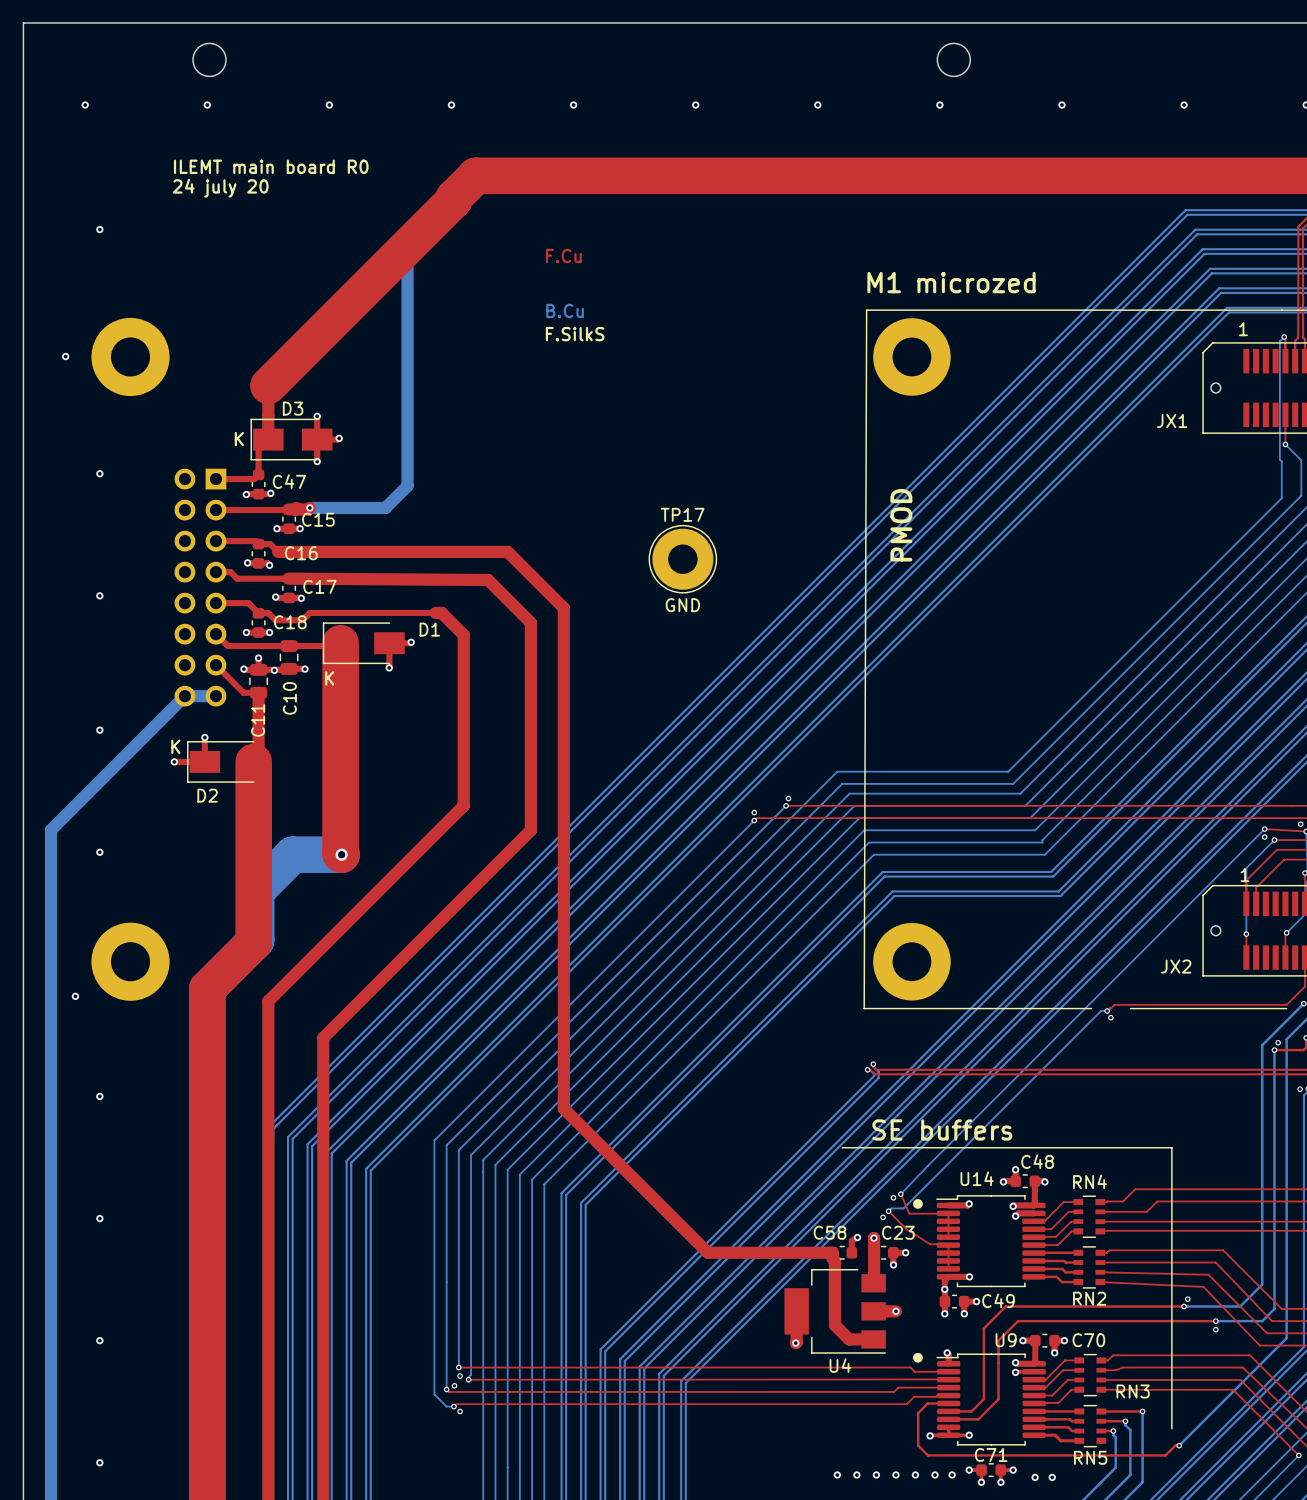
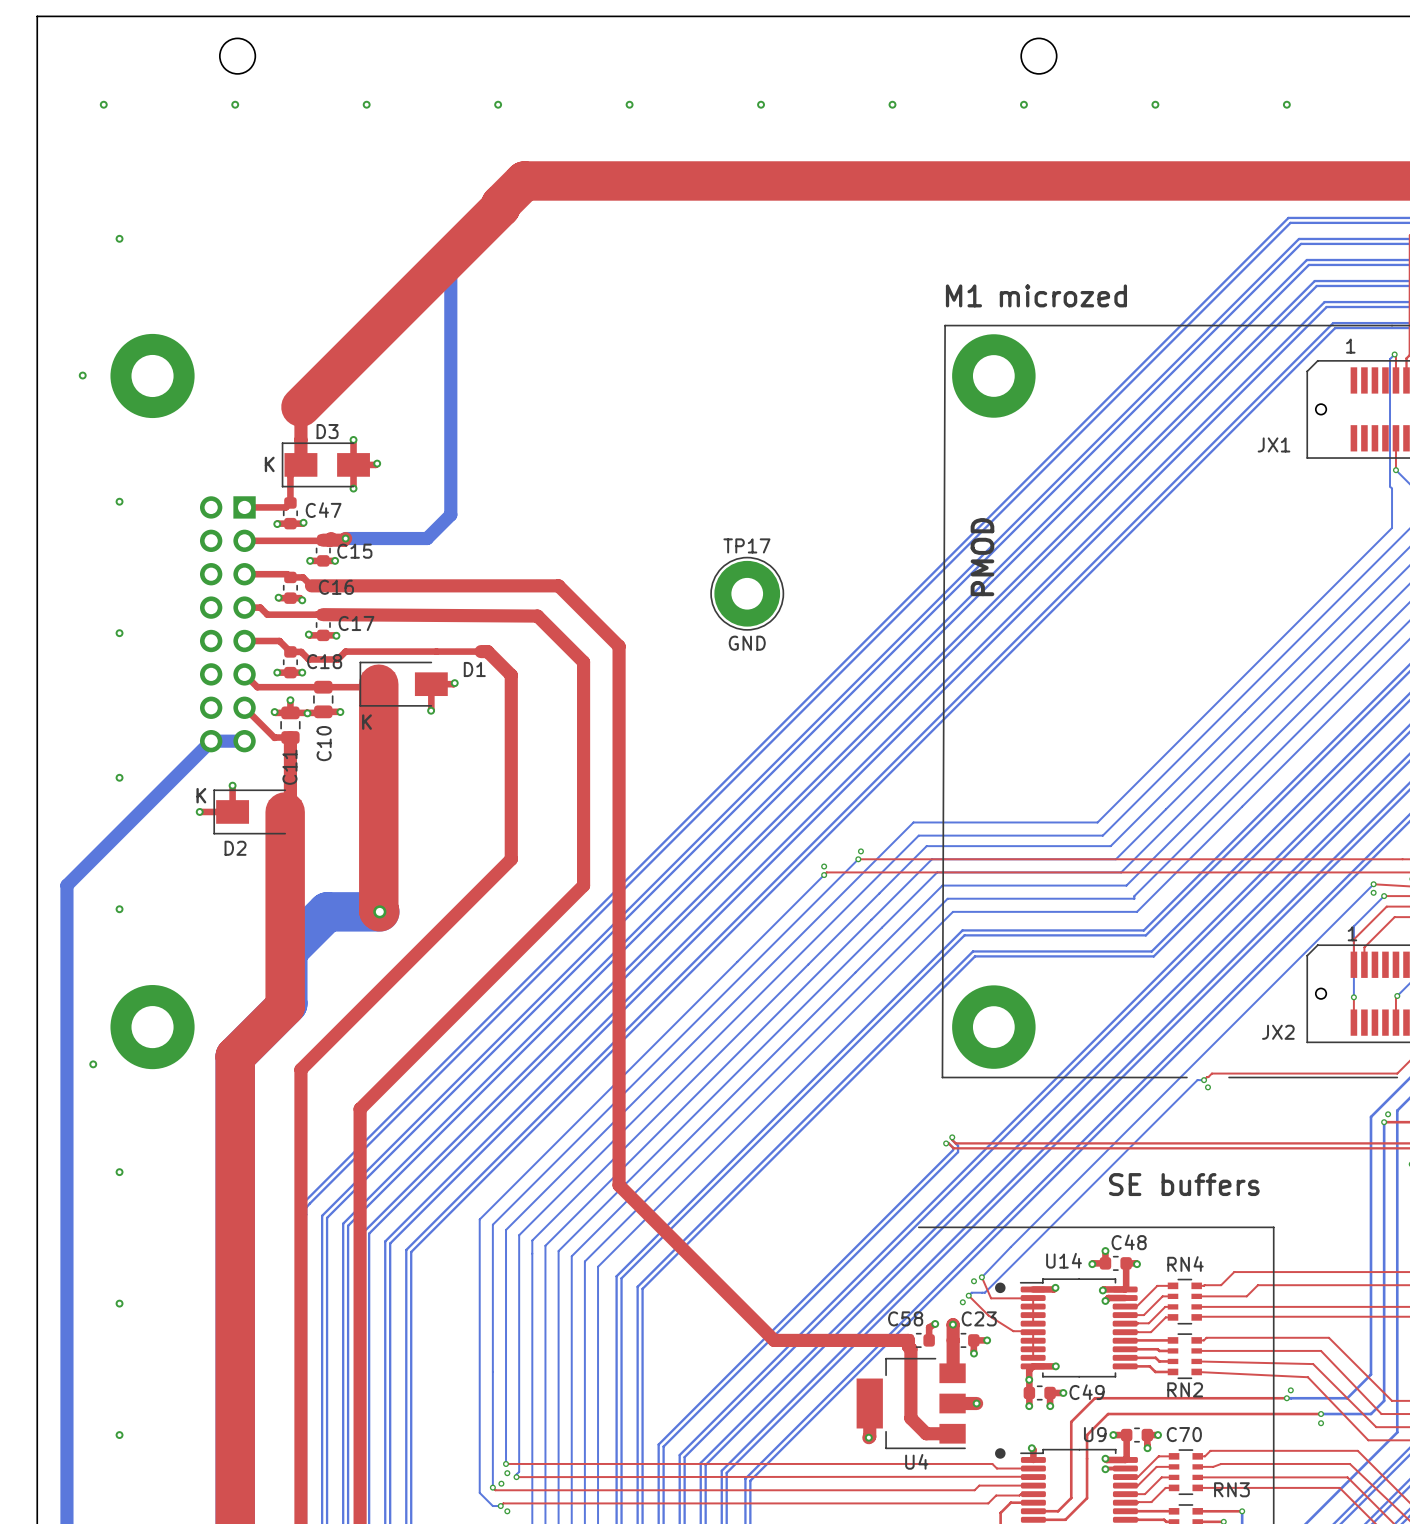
text: ILEMT main board R0 (271, 166) -> none
text: 24 july 20 (220, 188) -> none
text: F.Cu (563, 255) -> none
text: B.Cu (565, 310) -> none
text: F.SilkS (575, 334) -> none
text position: SE buffers (942, 1129) -> SE buffers (1184, 1184)

